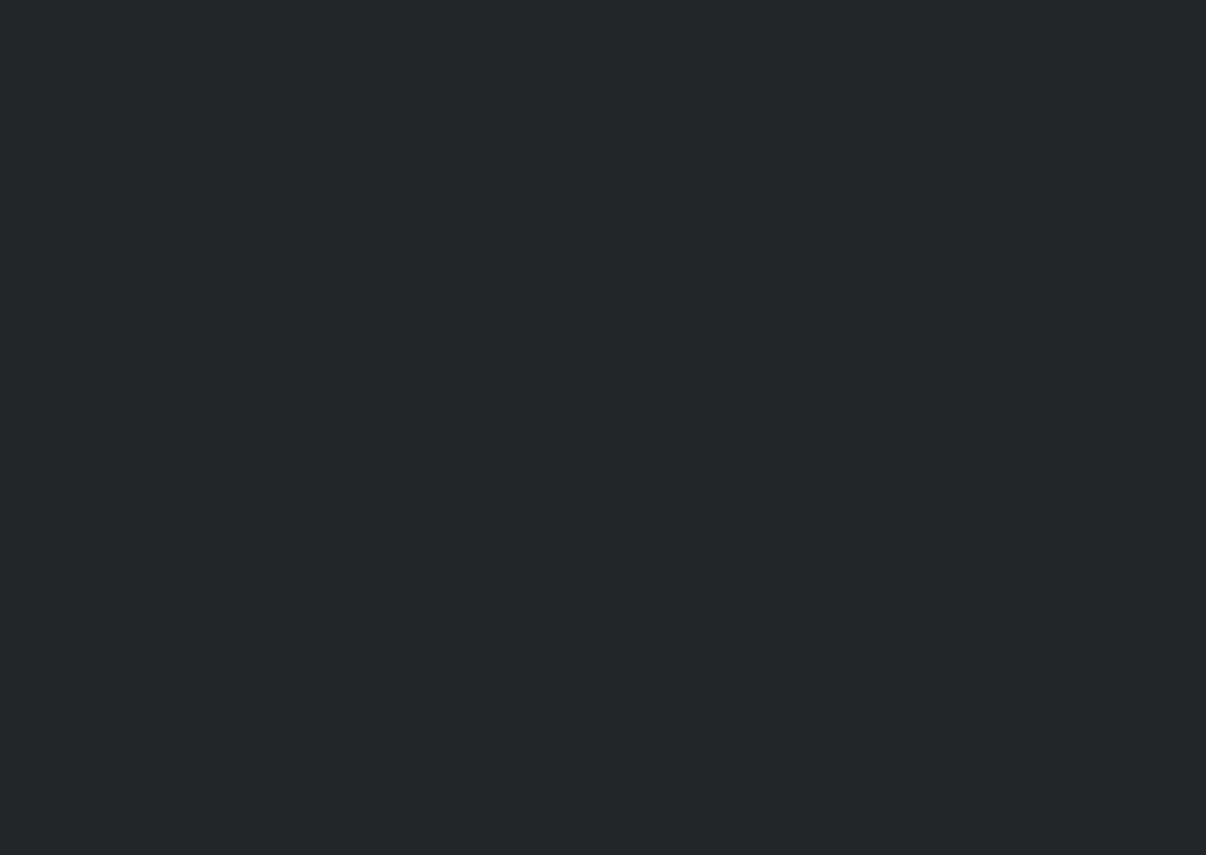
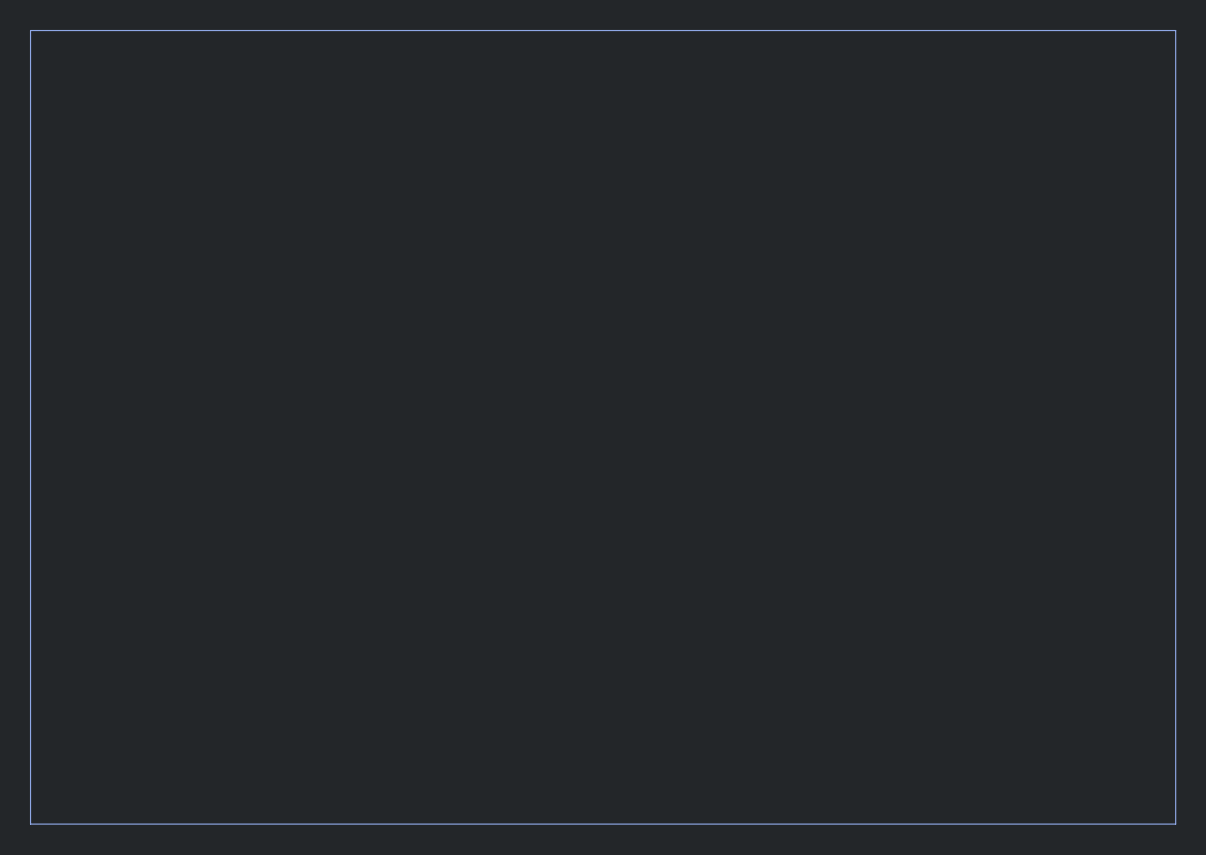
line: none -> (30, 30) (30, 824) (1175, 824) (1175, 30) (30, 30)

